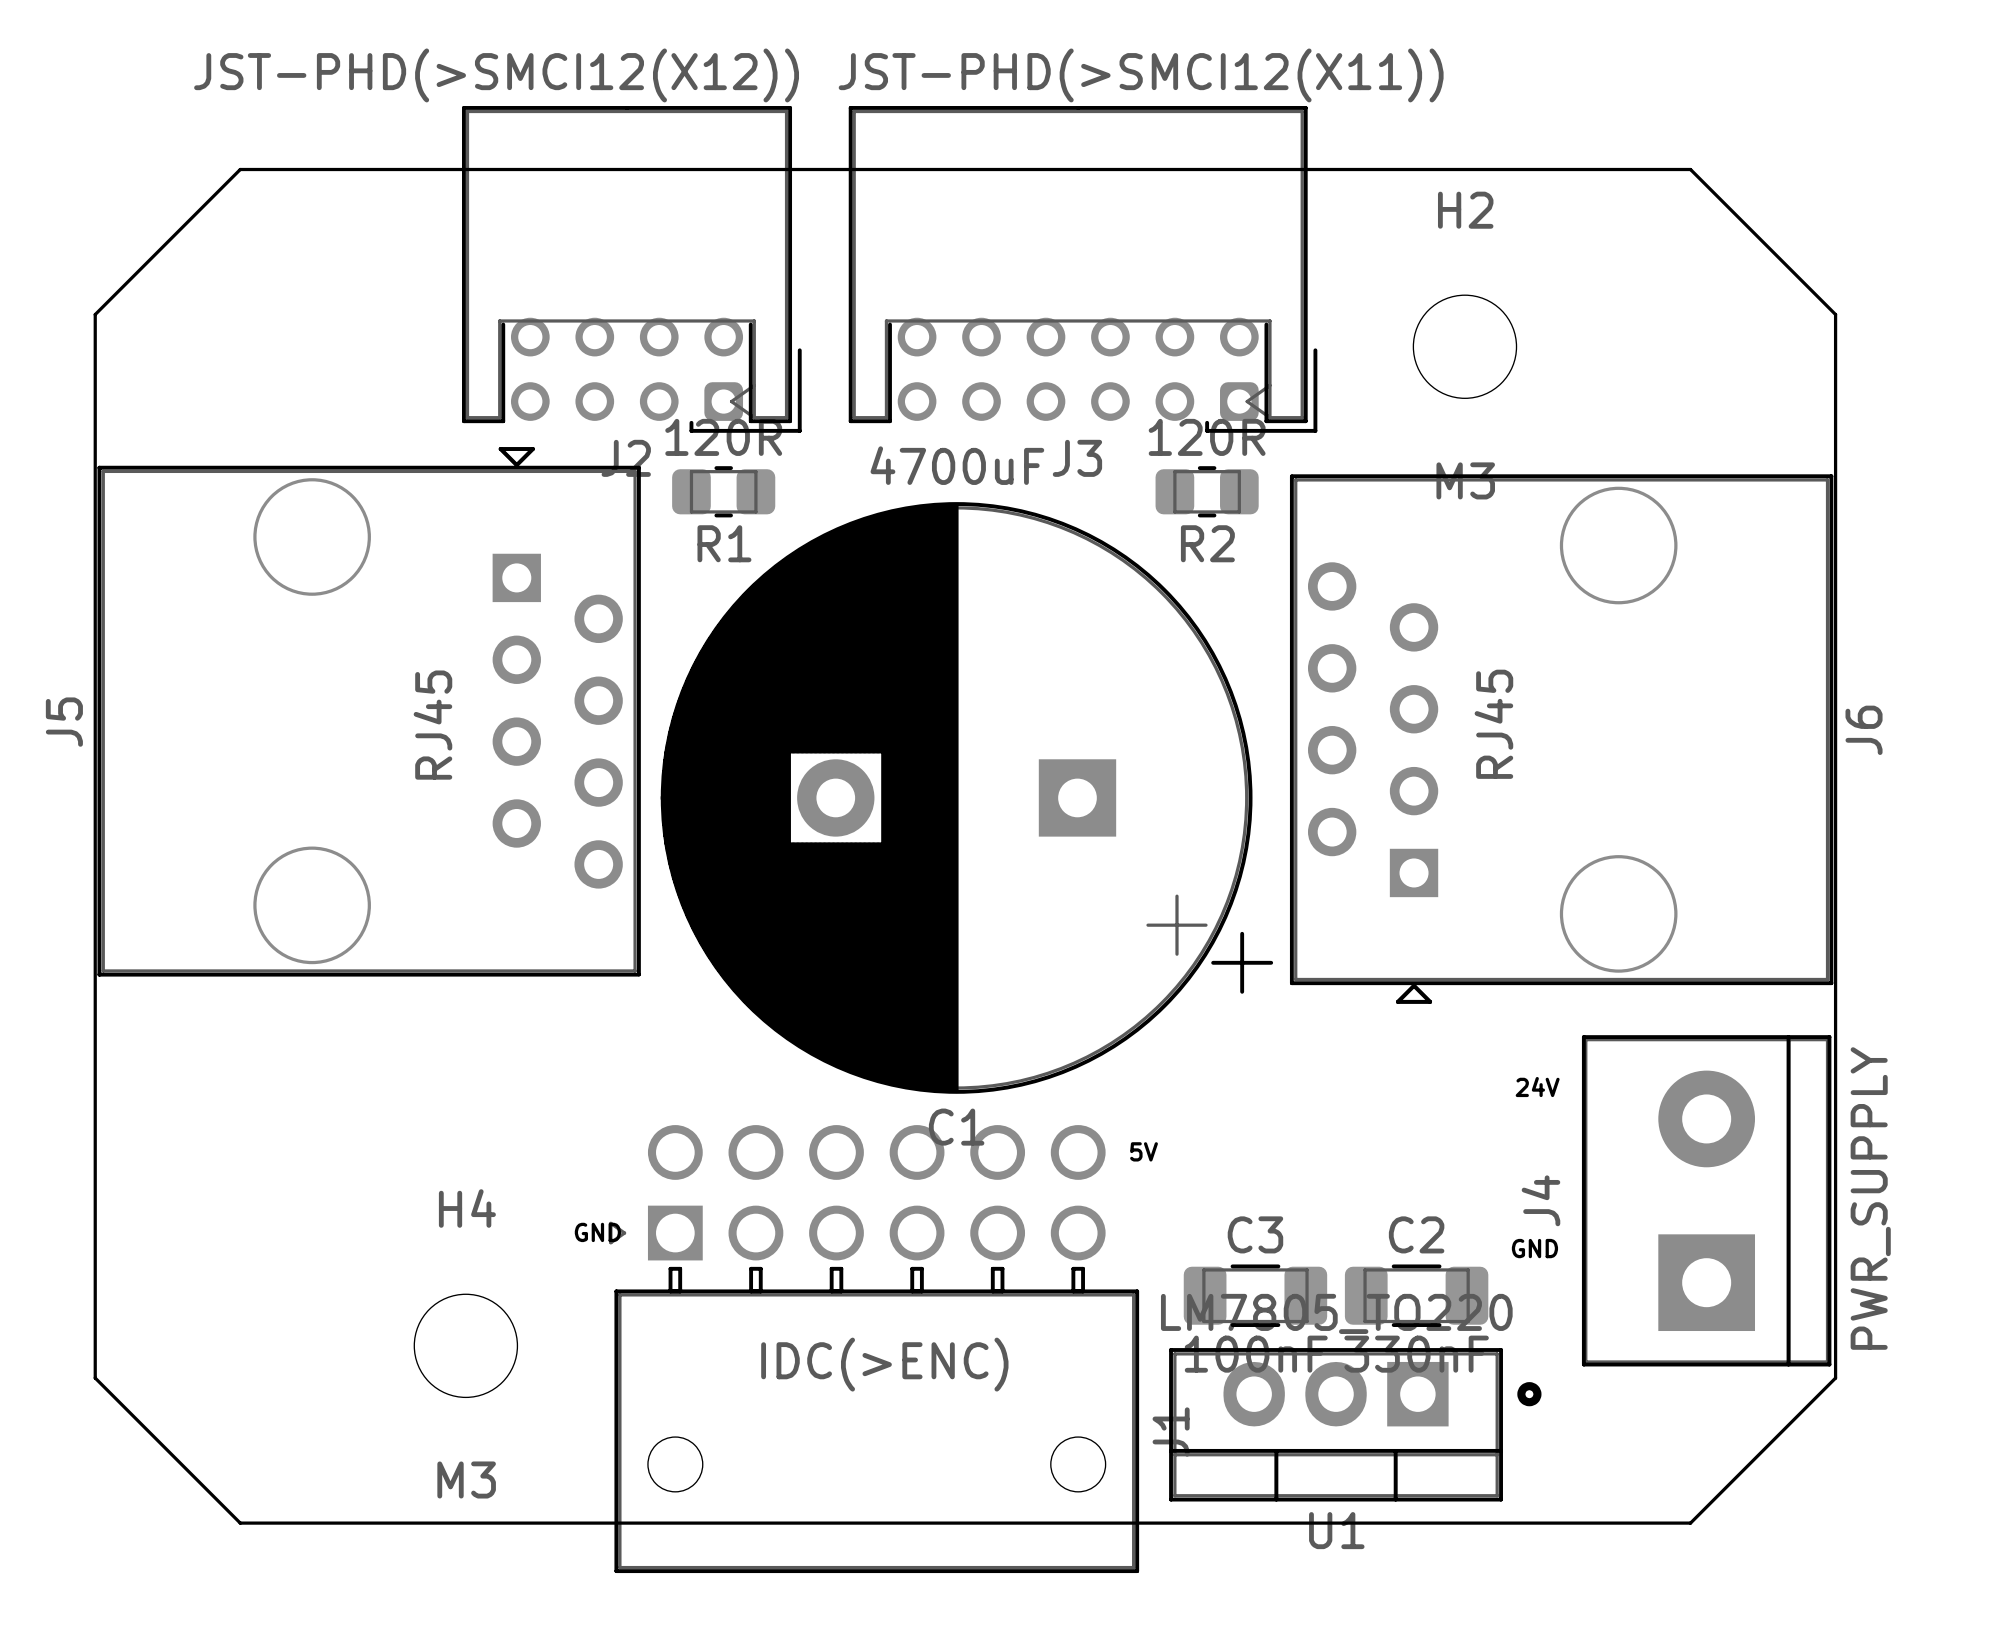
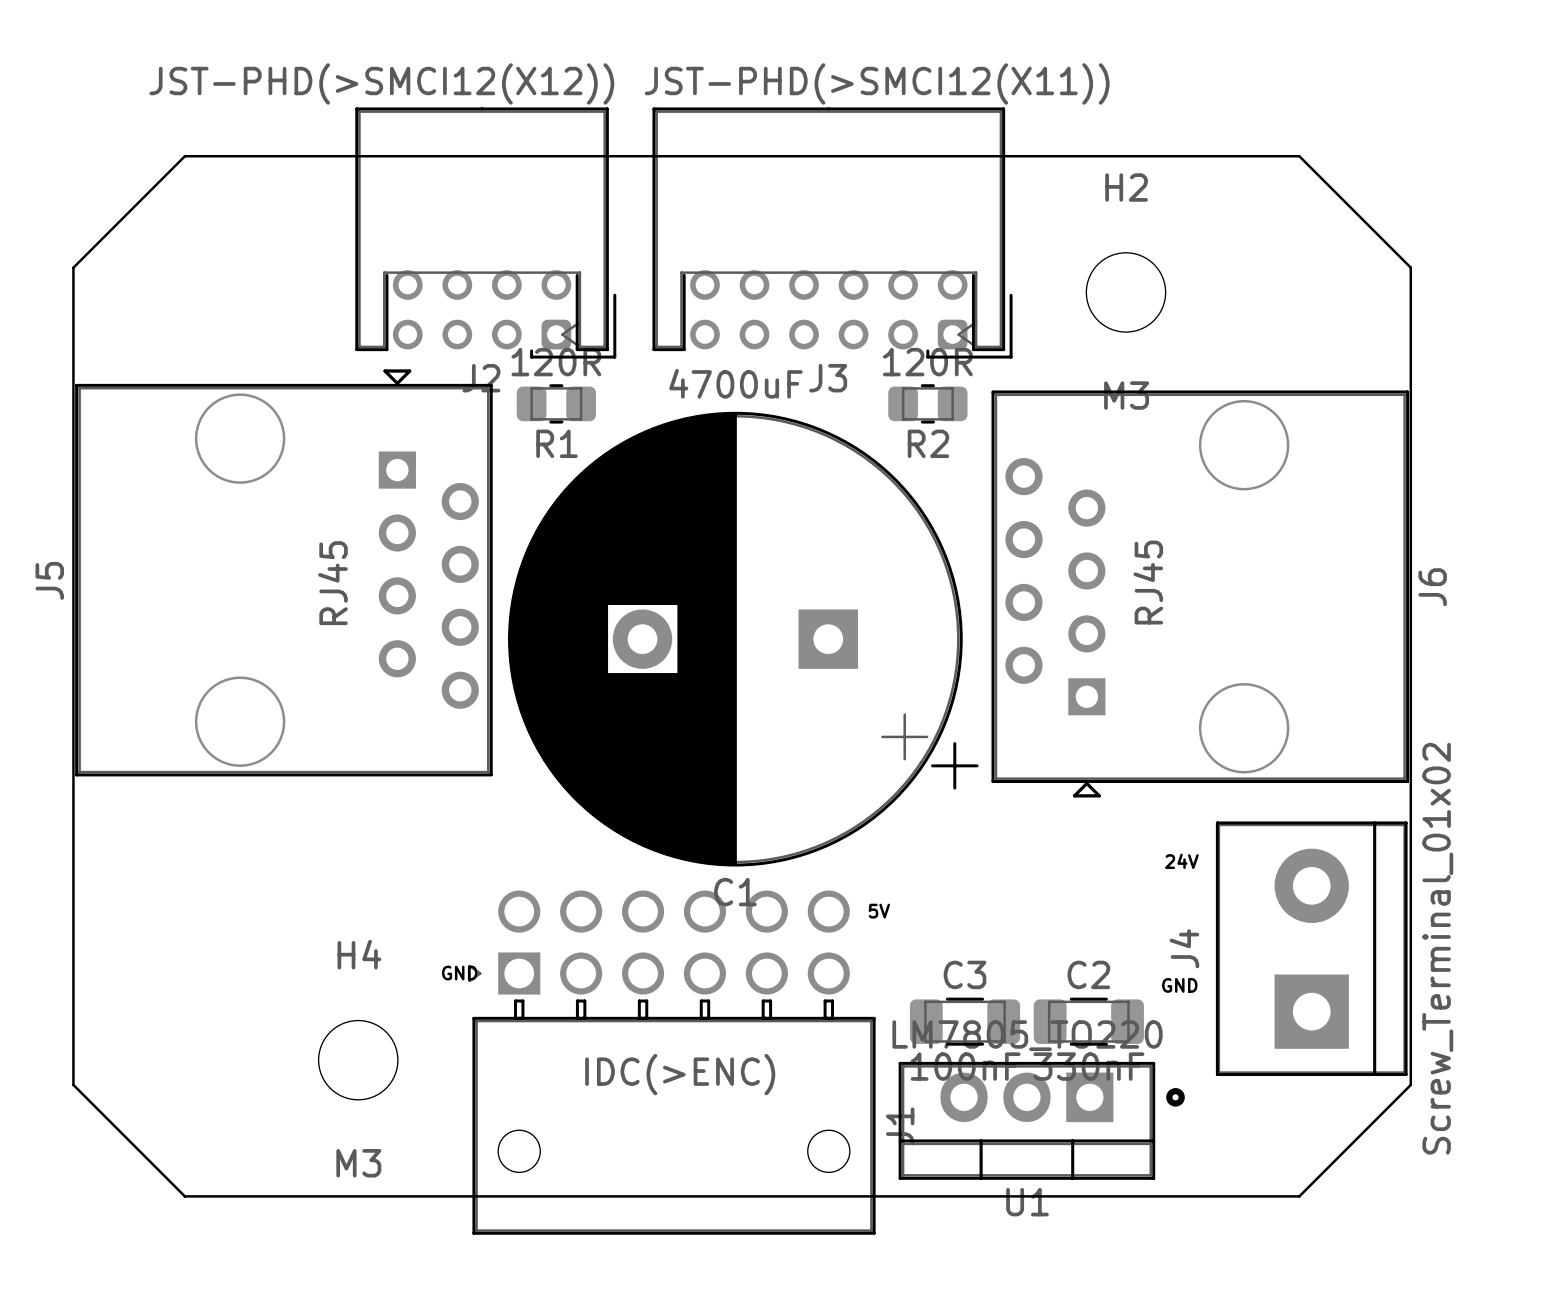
J4 value: PWR_SUPPLY (1870, 1198) -> Screw_Terminal_01x02 (1437, 948)

